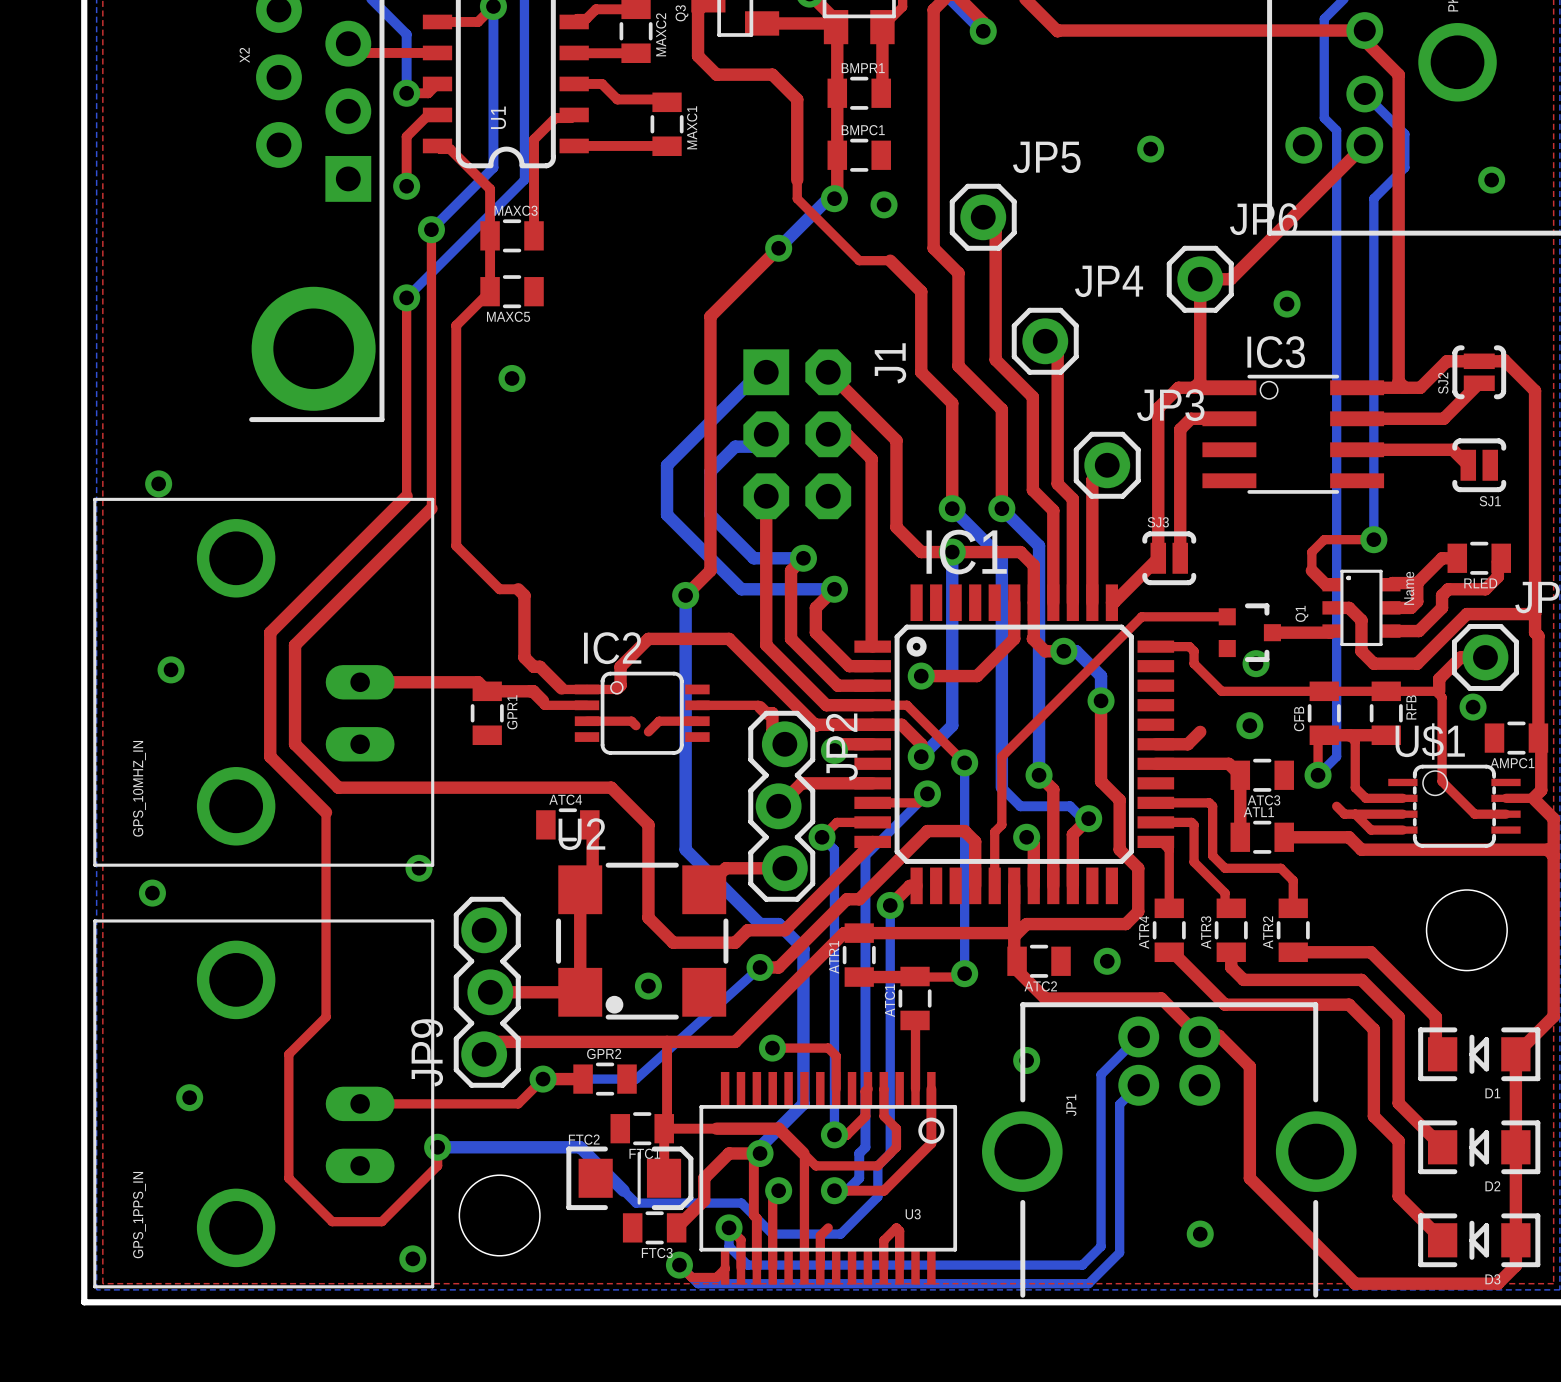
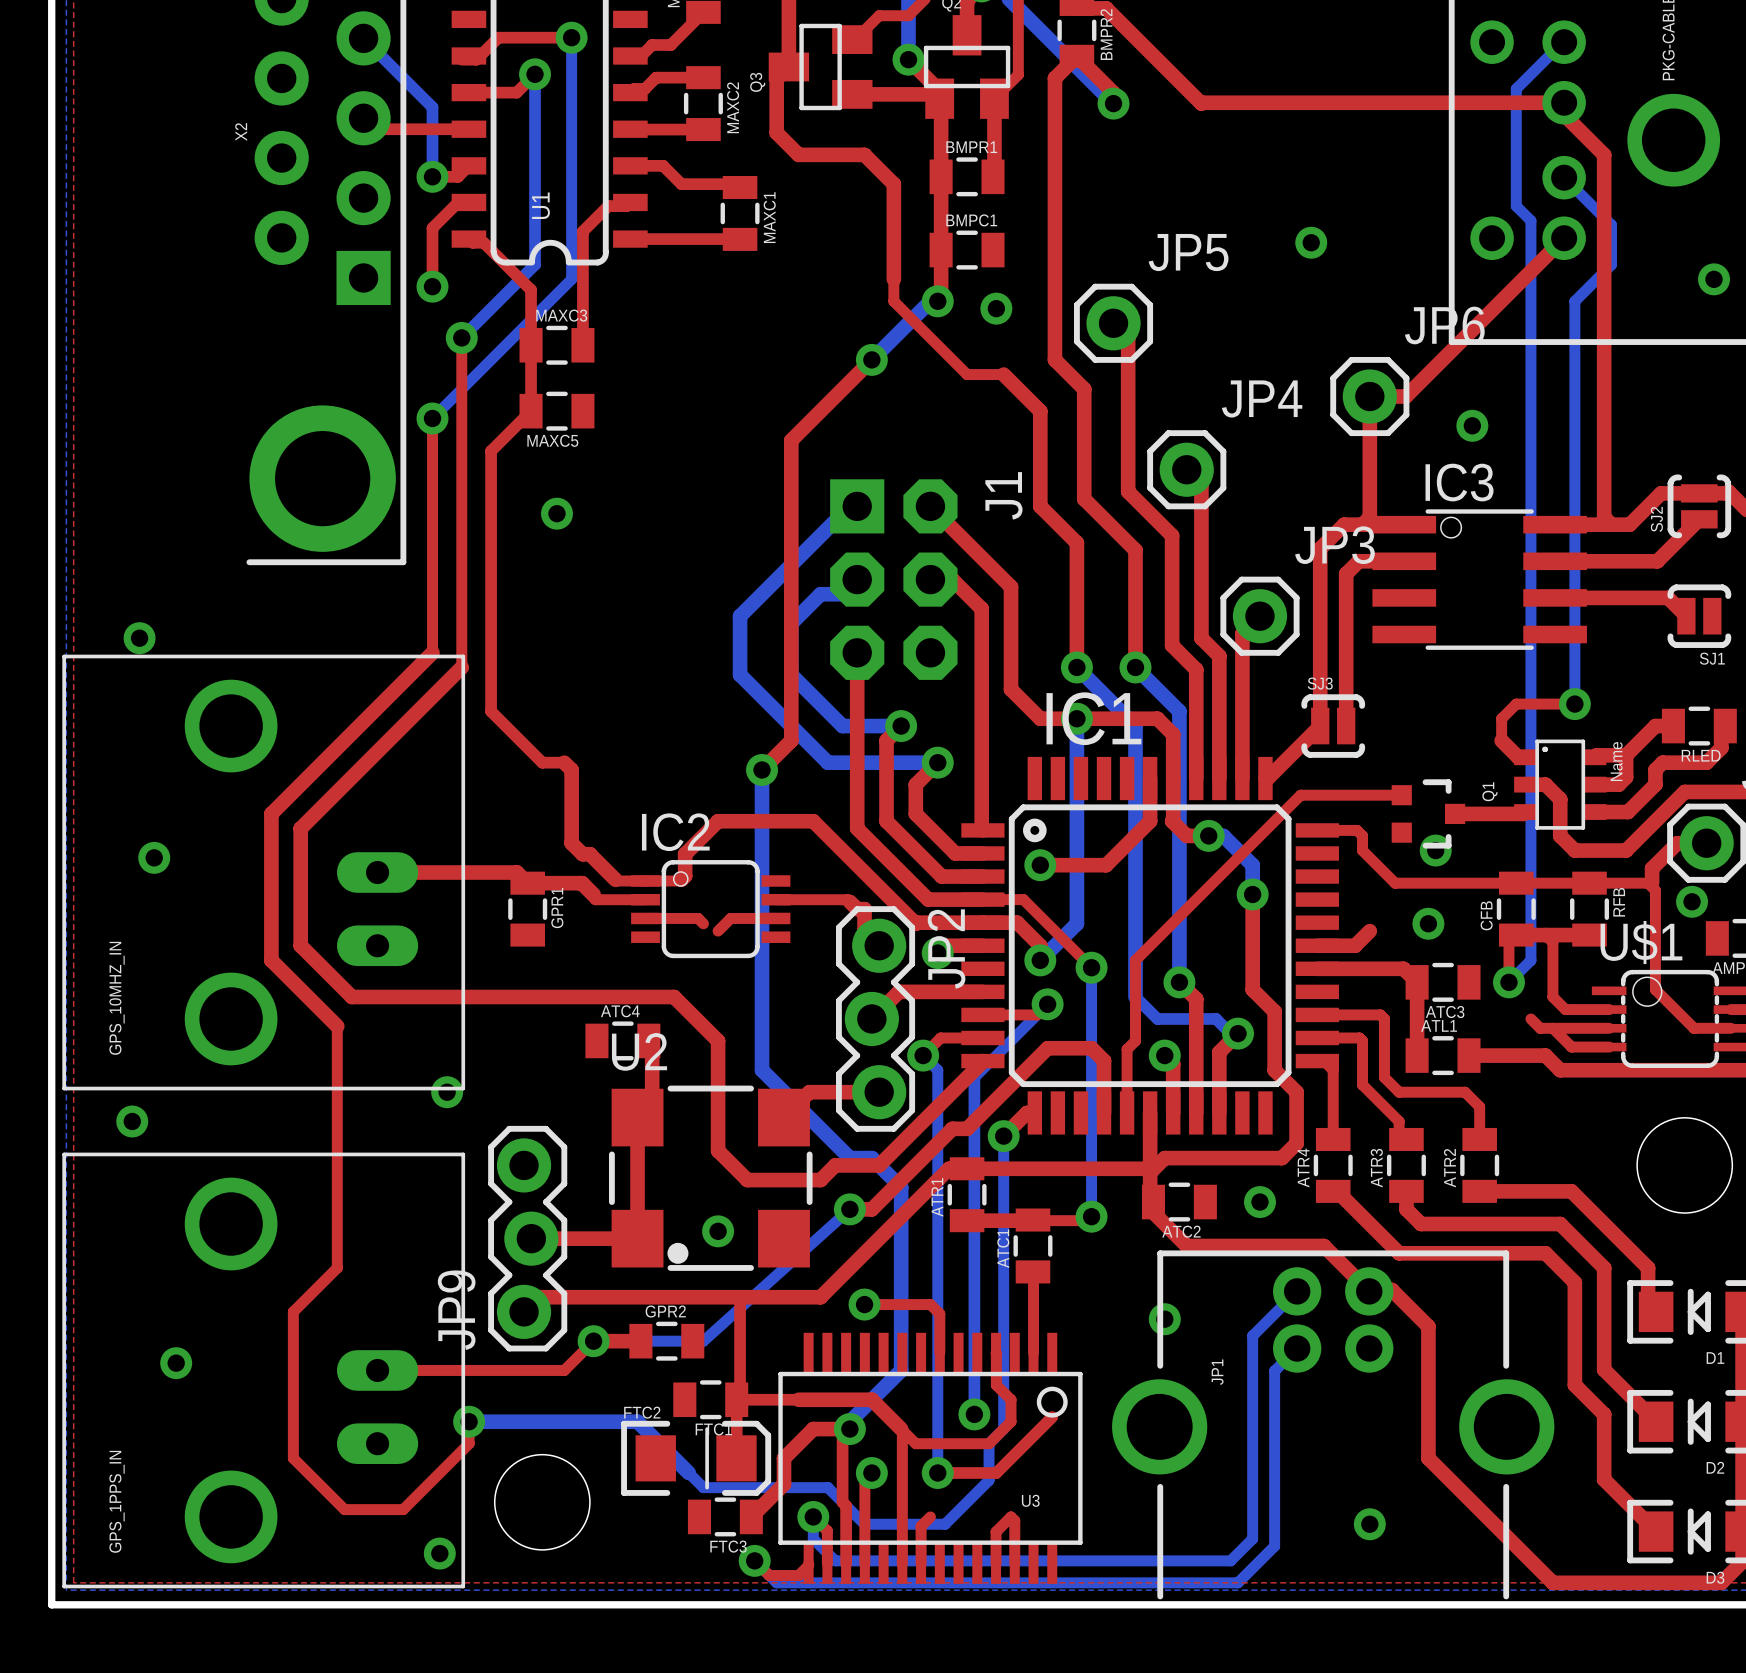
top track: (867, 1089) (865, 1091) (865, 1116) (846, 1134) (834, 1134) -> none
top track: (931, 1089) (931, 1143) -> none
via position: (834, 1134) -> (974, 1414)
bottom track: (865, 1141) (865, 1147) (859, 1153) (859, 1178) (846, 1190) (834, 1190) -> (937, 1407) (937, 1472)

